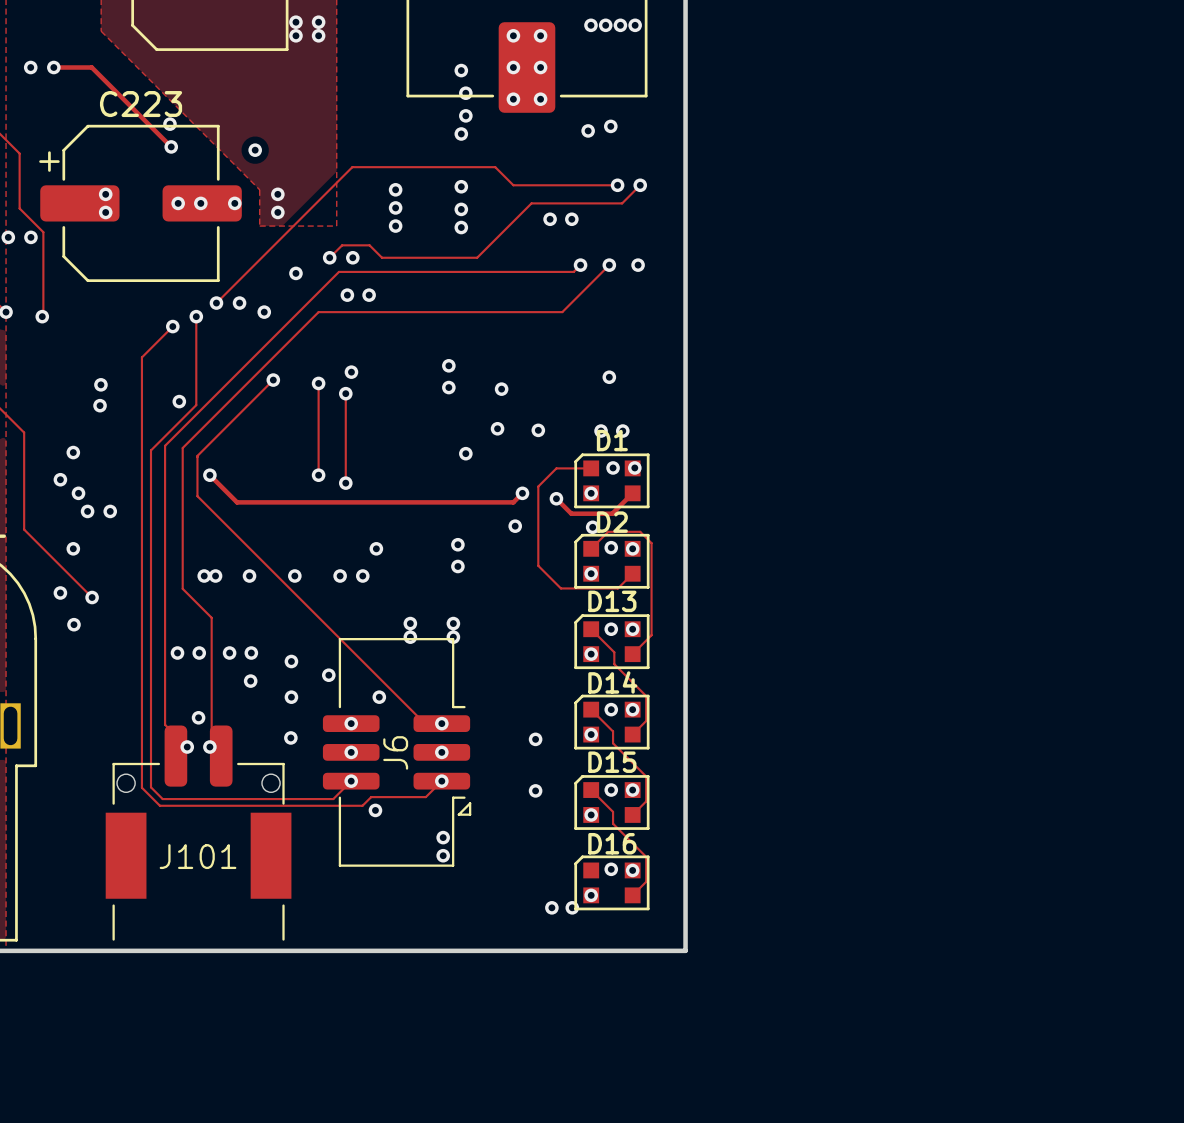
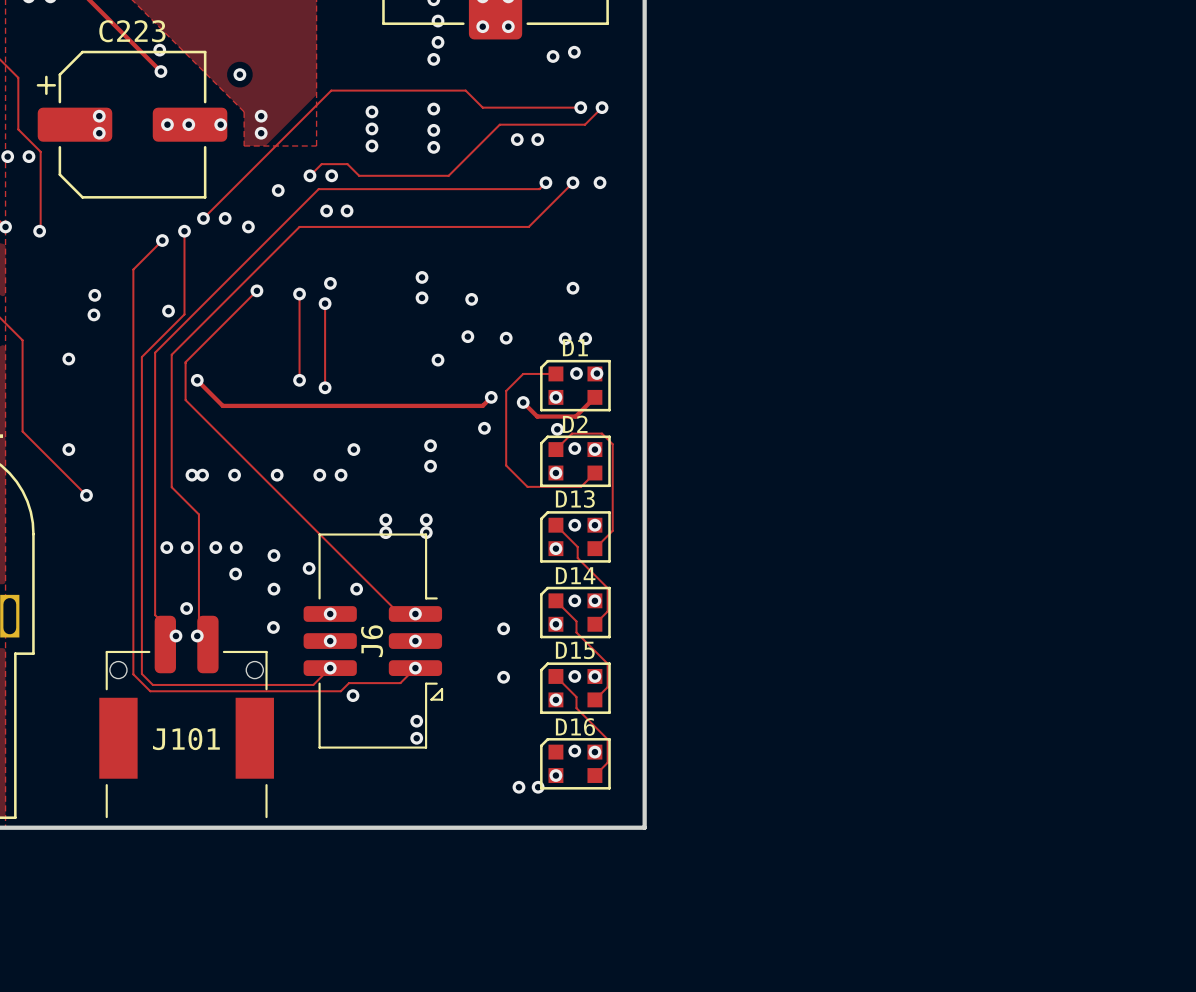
via: (60, 479) -> none
via: (78, 493) -> none
via: (87, 511) -> none
via: (110, 511) -> none
via: (60, 592) -> none
via: (73, 624) -> none

